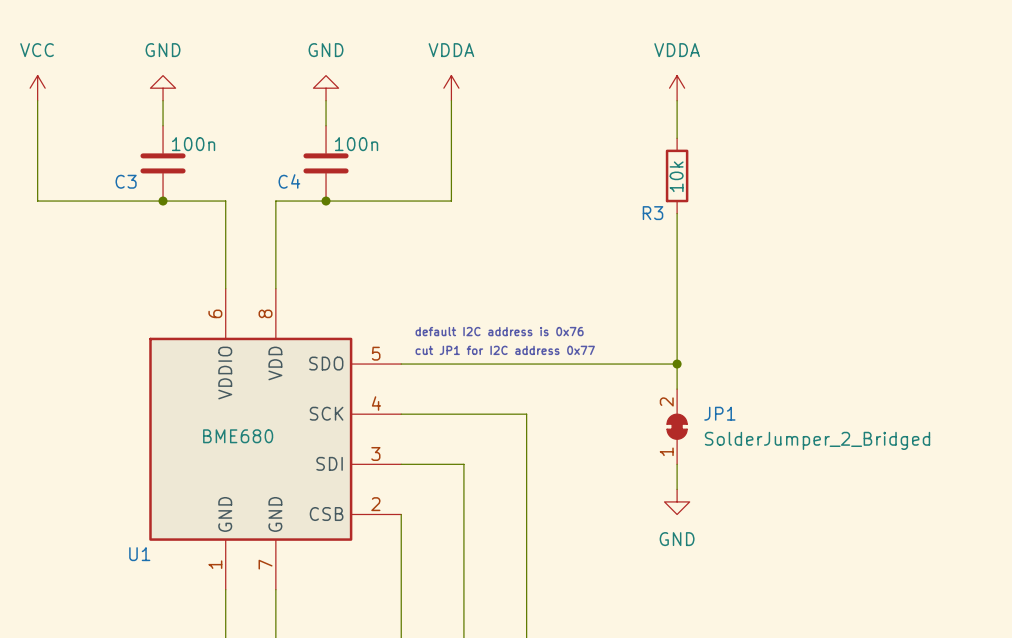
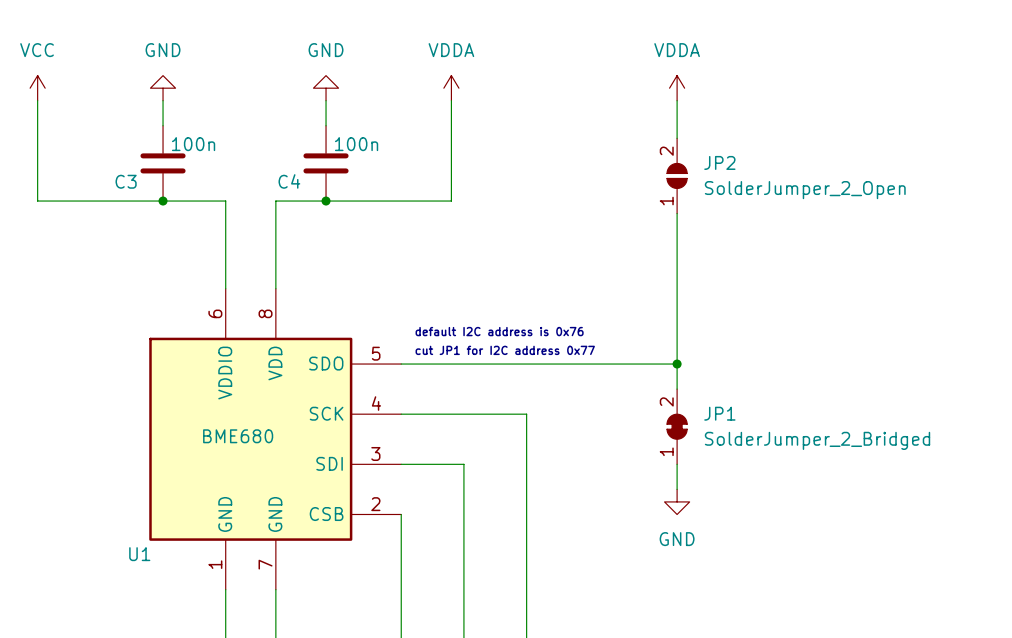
R3: 10k (677, 175) -> none
JP2: none -> SolderJumper_2_Open (677, 175)

